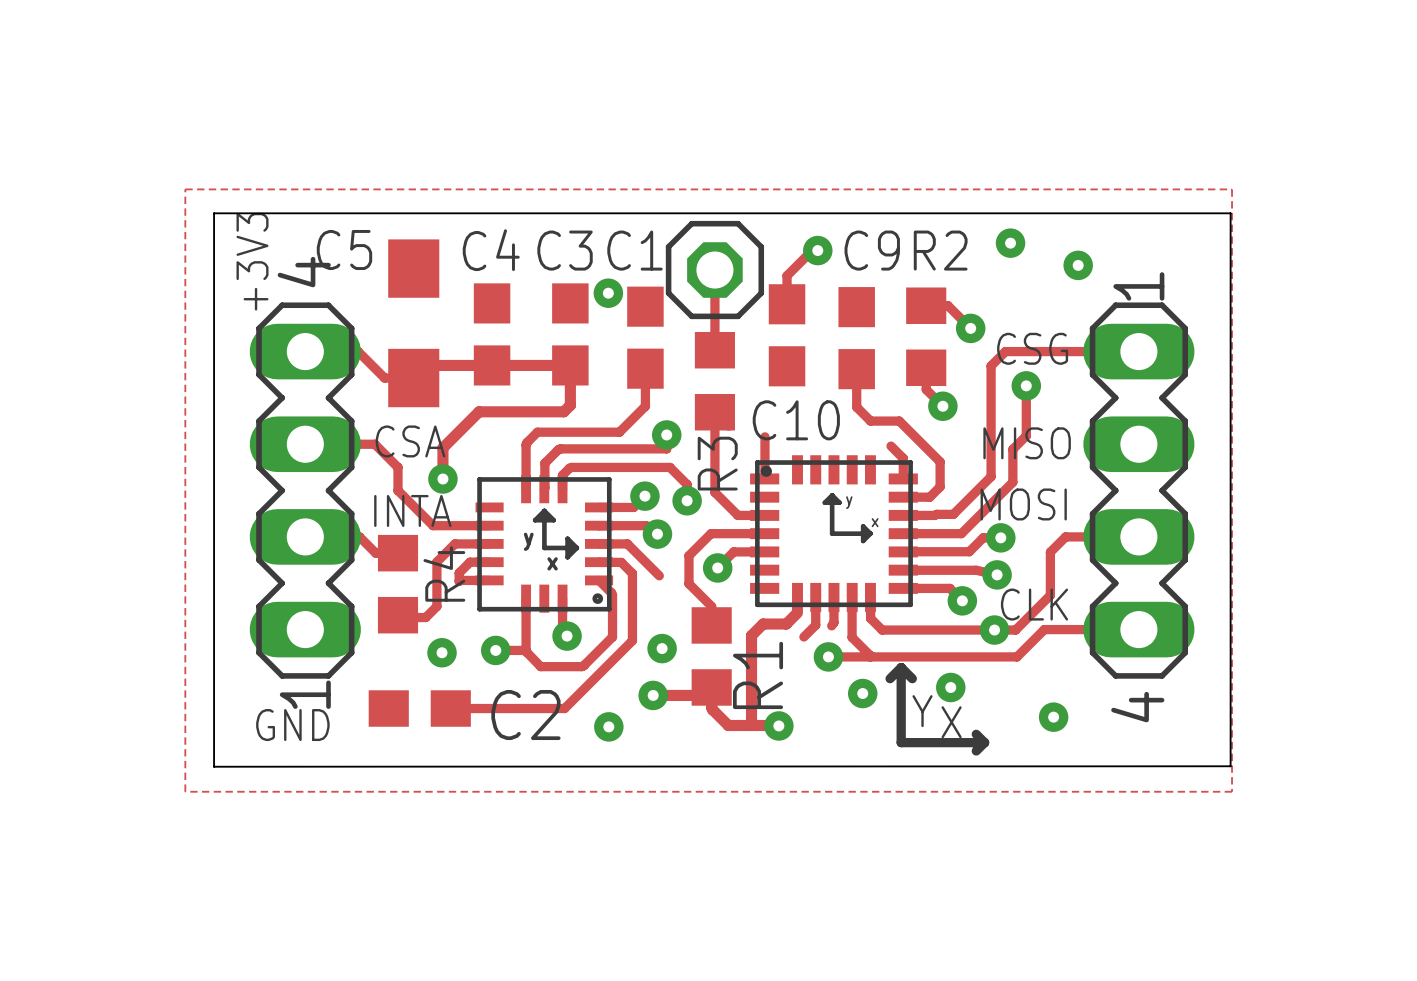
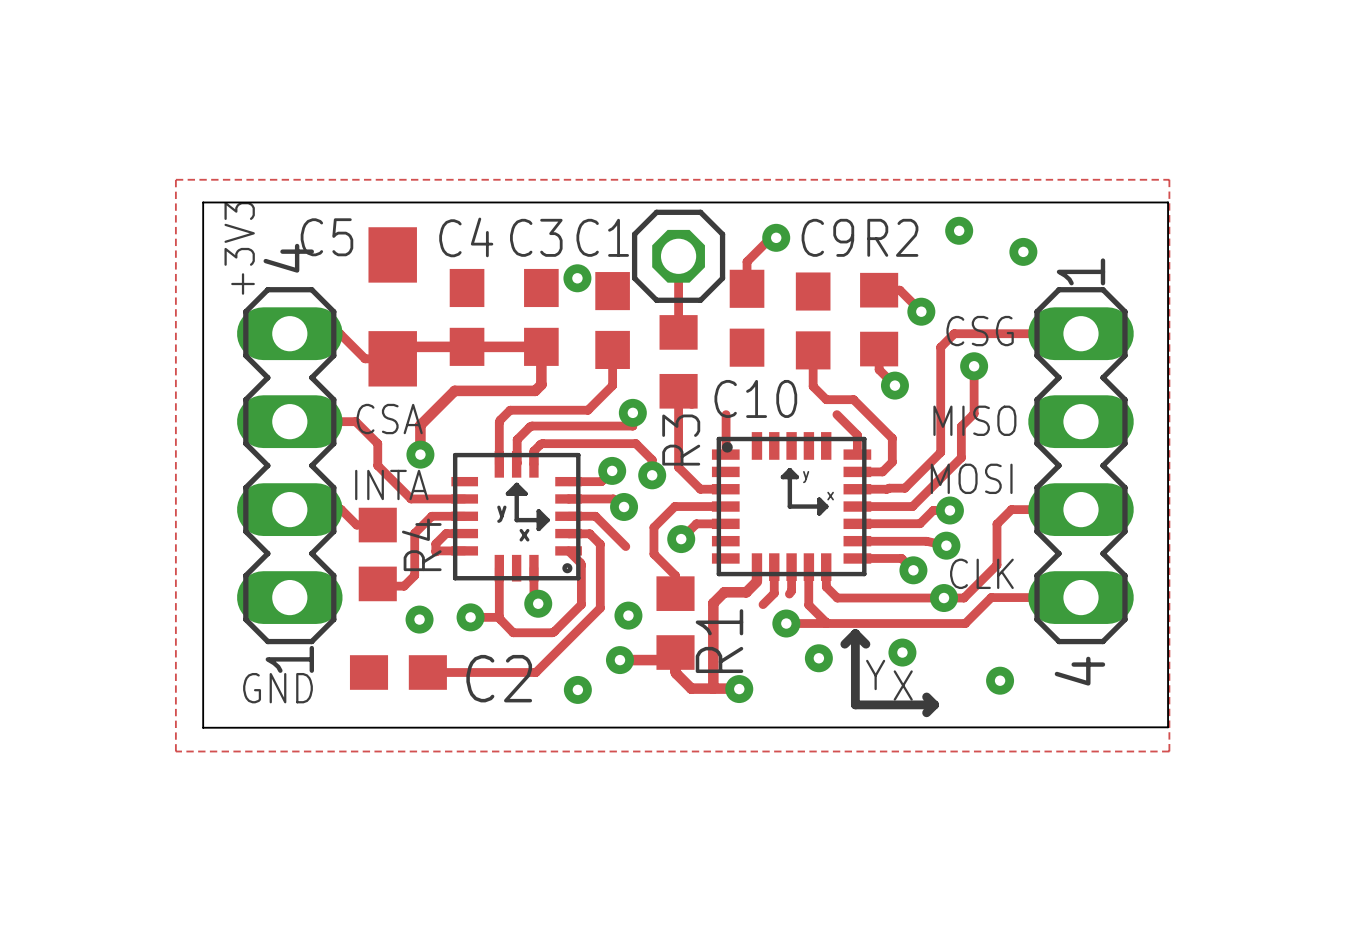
track: none -> (836, 414) (845, 423)

